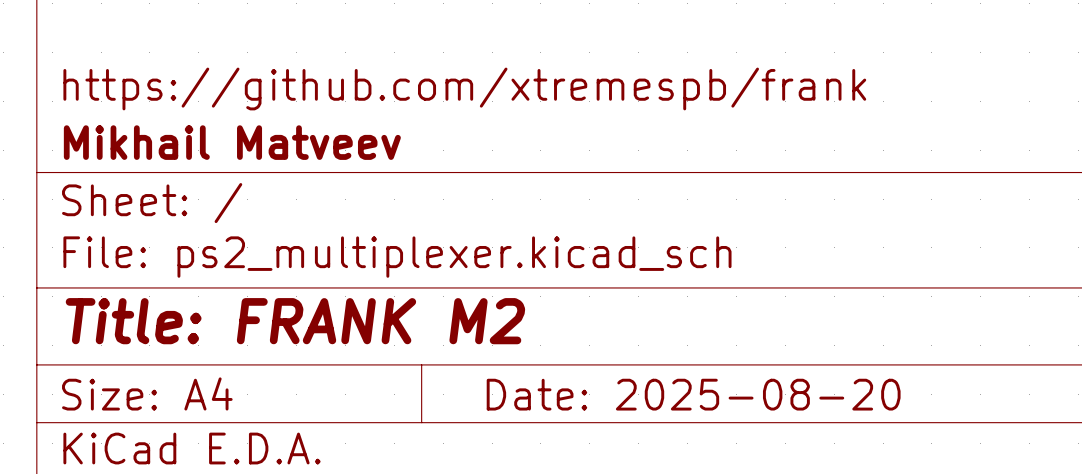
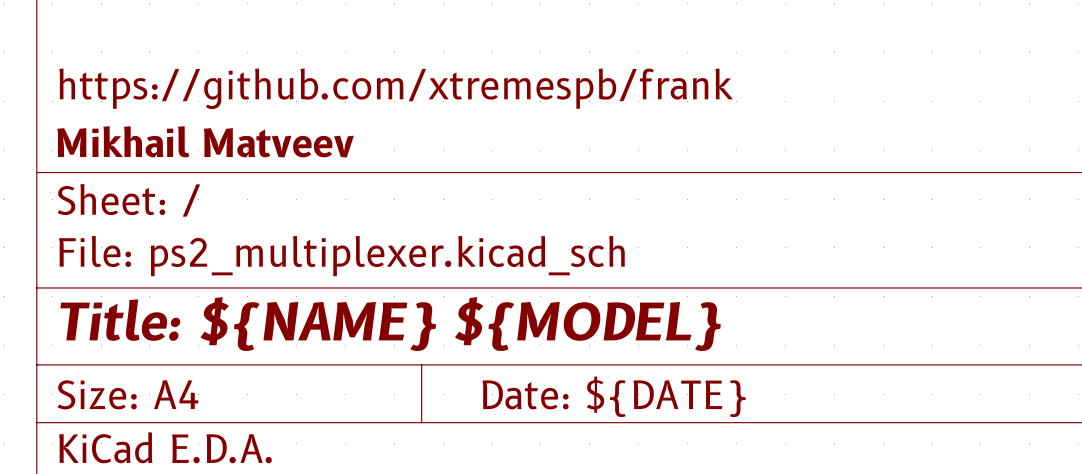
title block: Title: FRANK M2 (295, 321) -> Title: ${NAME} ${MODEL} (390, 324)
title block: Date: 2025-08-20 (693, 394) -> Date: ${DATE} (614, 396)

